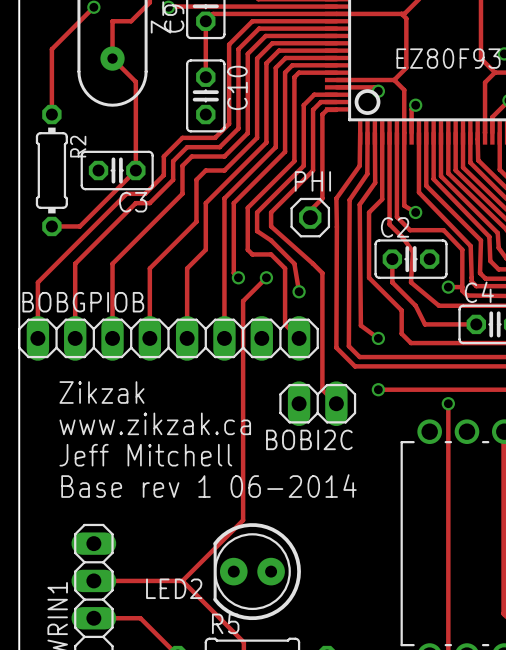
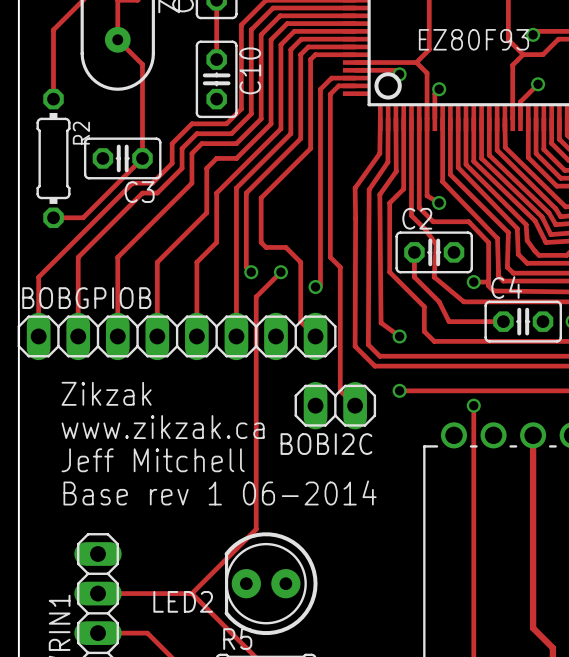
track: (336, 109) (327, 109) (322, 114) (322, 198) (310, 210) (310, 217) -> none
track: (303, 165) (257, 212) (257, 231) (271, 240) (294, 263) (299, 291) -> (320, 153) (320, 287)
track: (313, 170) (271, 212) (271, 226) (313, 263) -> (330, 158) (330, 257)
PHI: (310, 217) -> none

